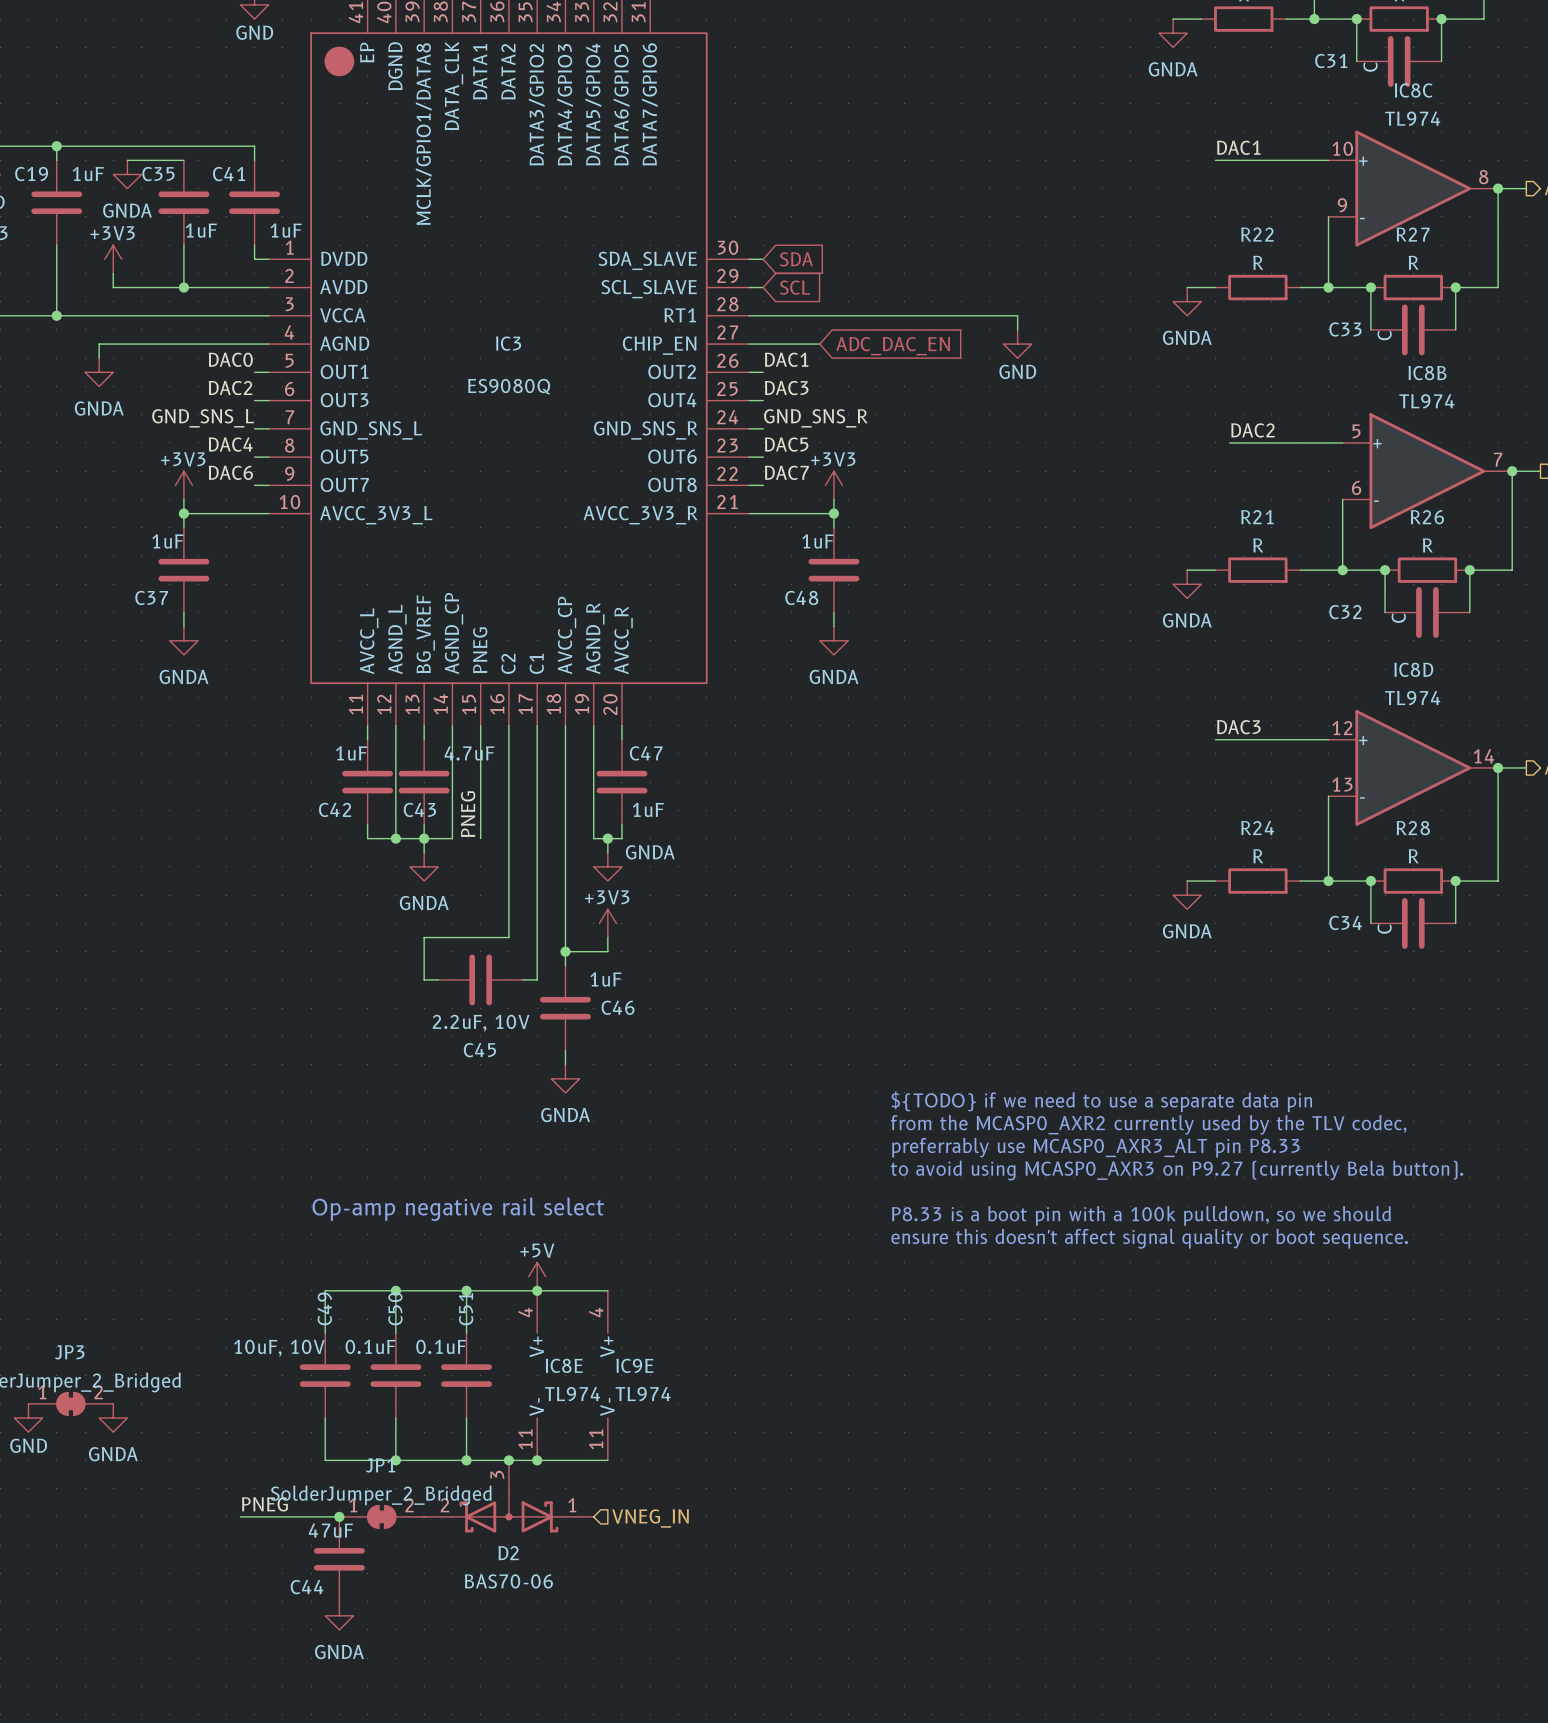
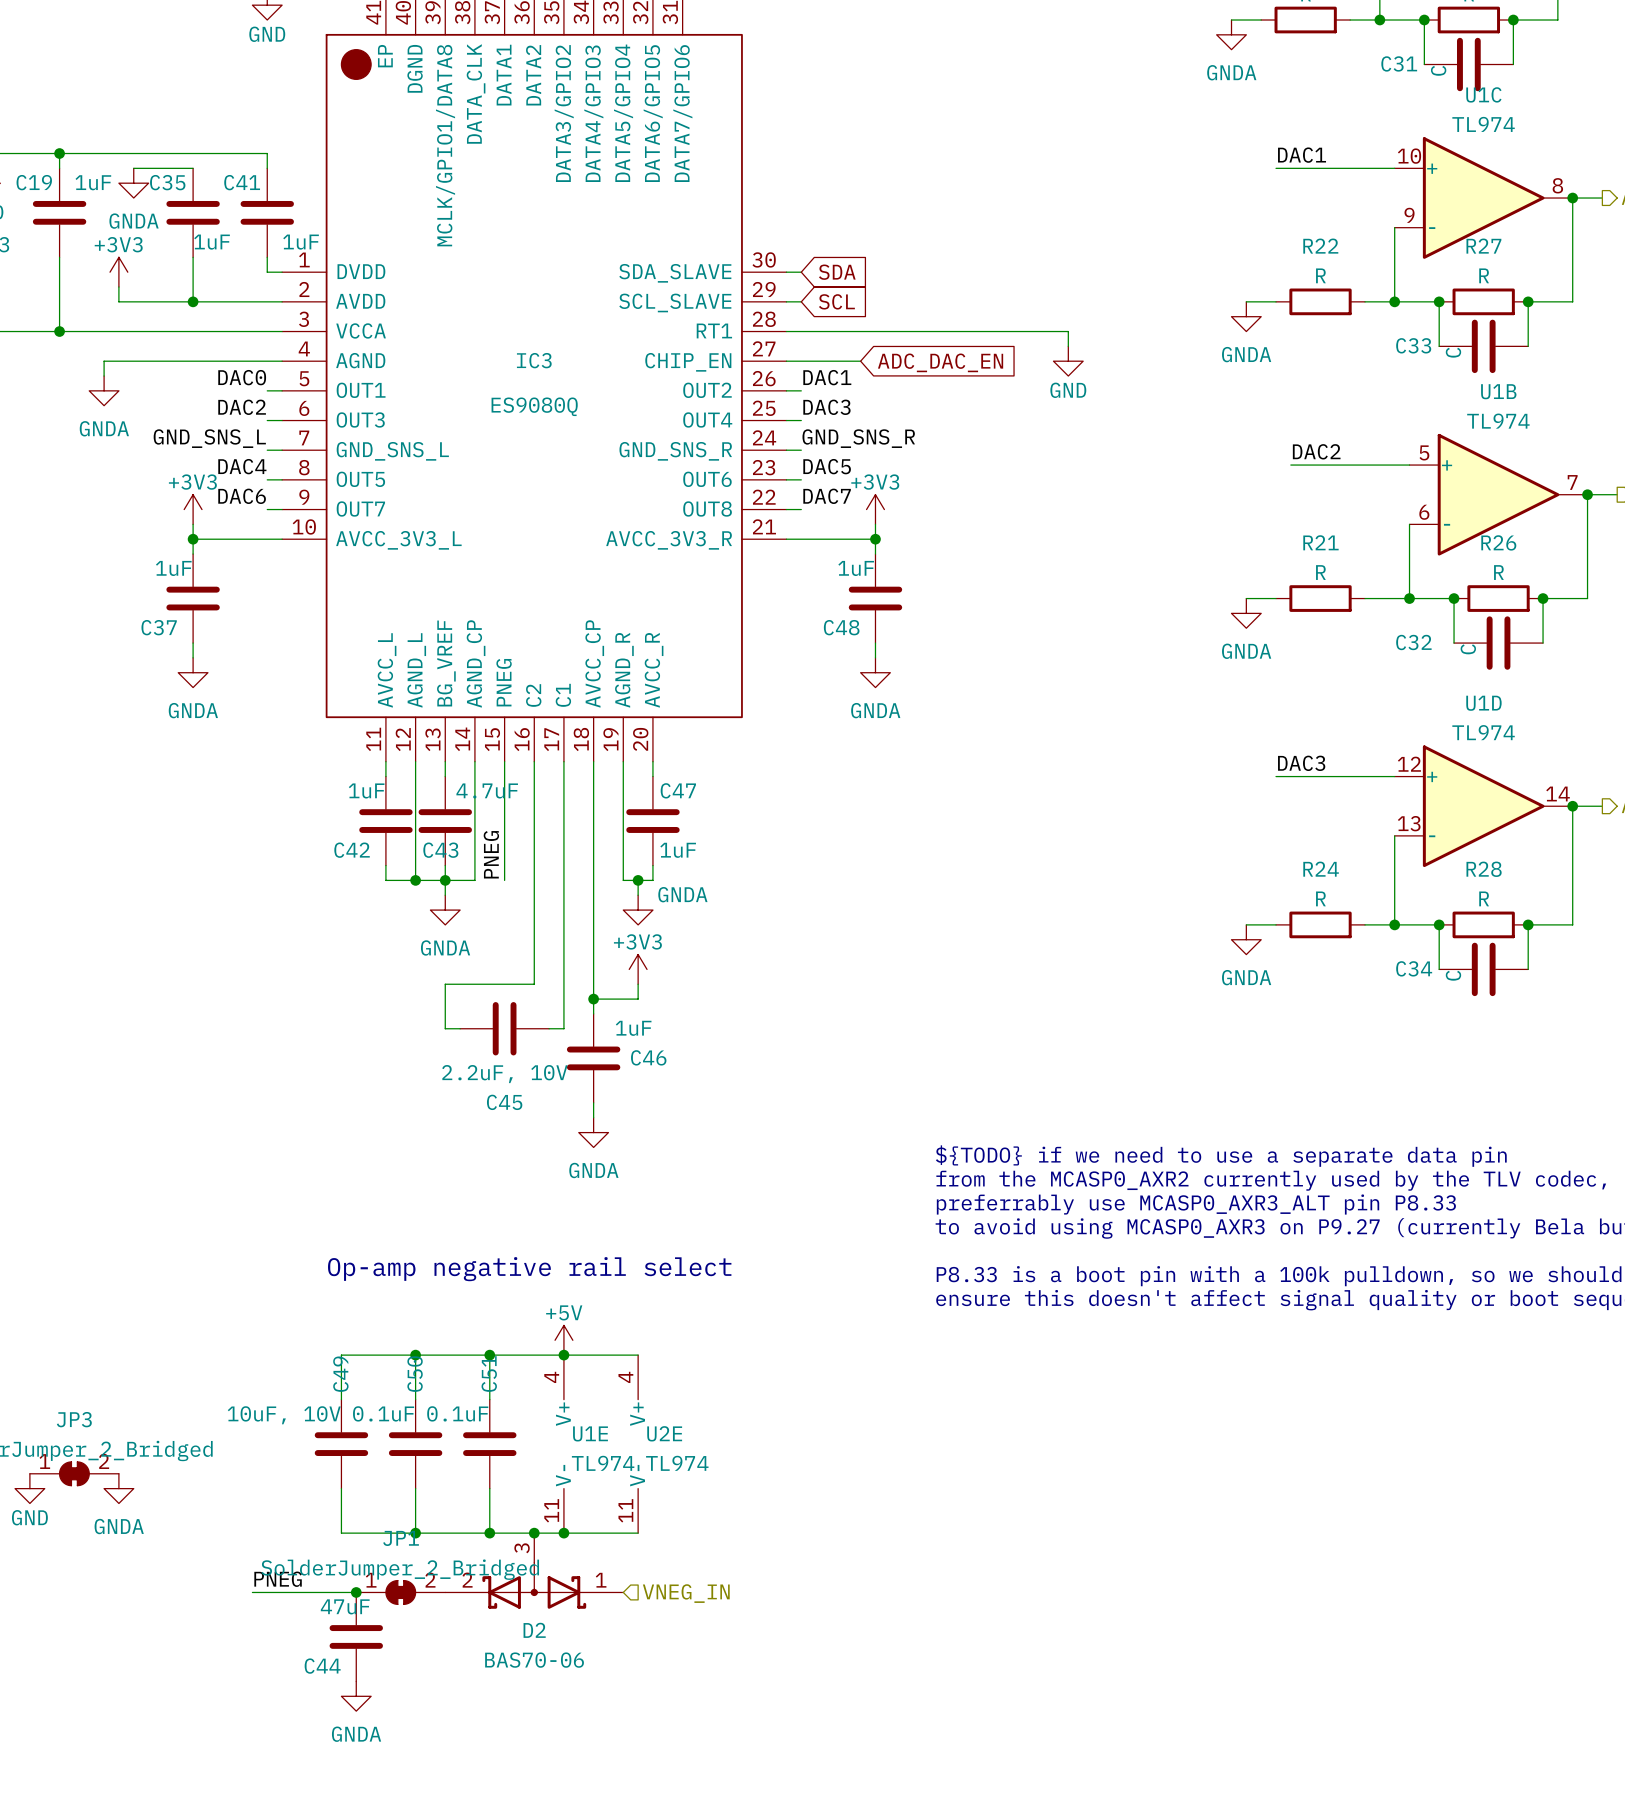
IC8C name: IC8C (1413, 90) -> U1C (1483, 94)
IC8B name: IC8B (1427, 373) -> U1B (1498, 391)
IC8D name: IC8D (1413, 669) -> U1D (1483, 703)
IC8E name: IC8E (564, 1365) -> U1E (590, 1433)
IC9E name: IC9E (634, 1365) -> U2E (664, 1433)

